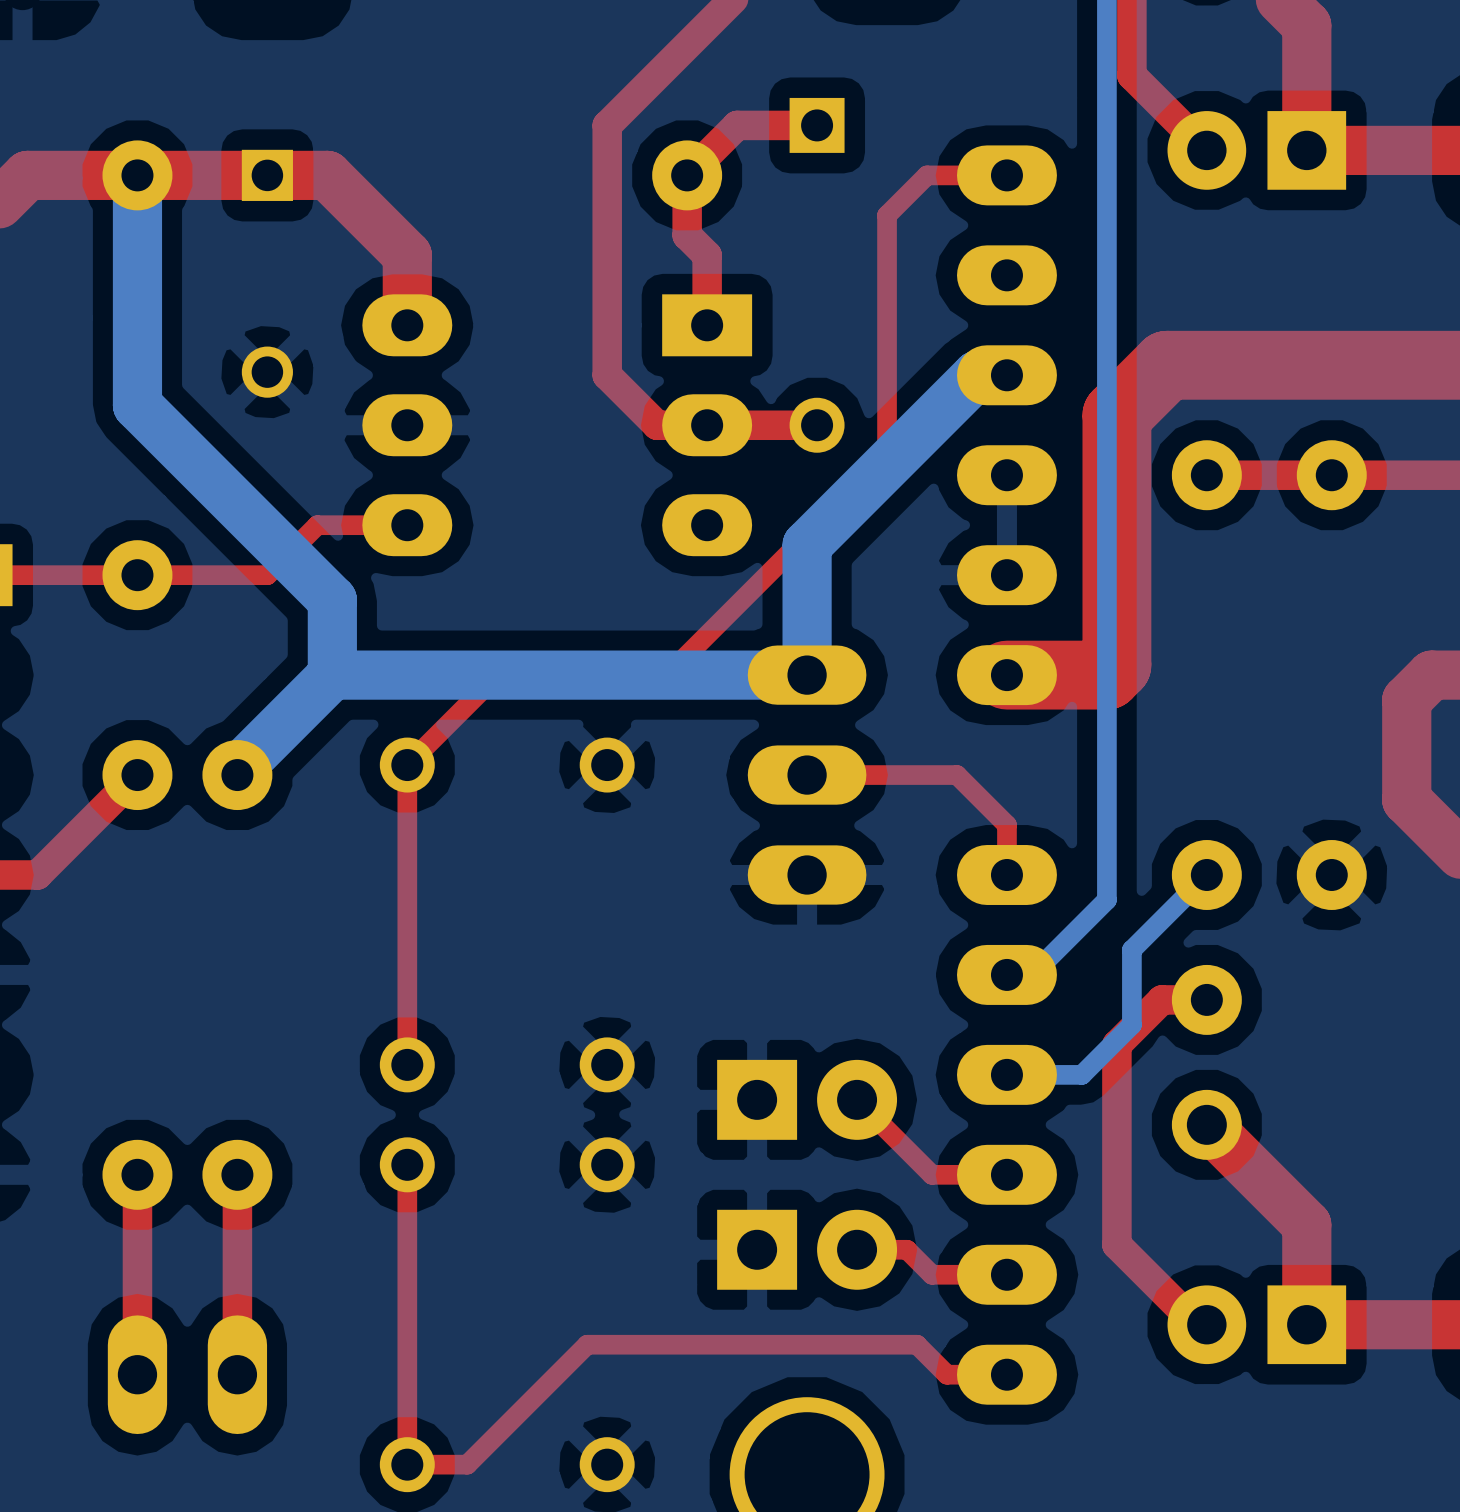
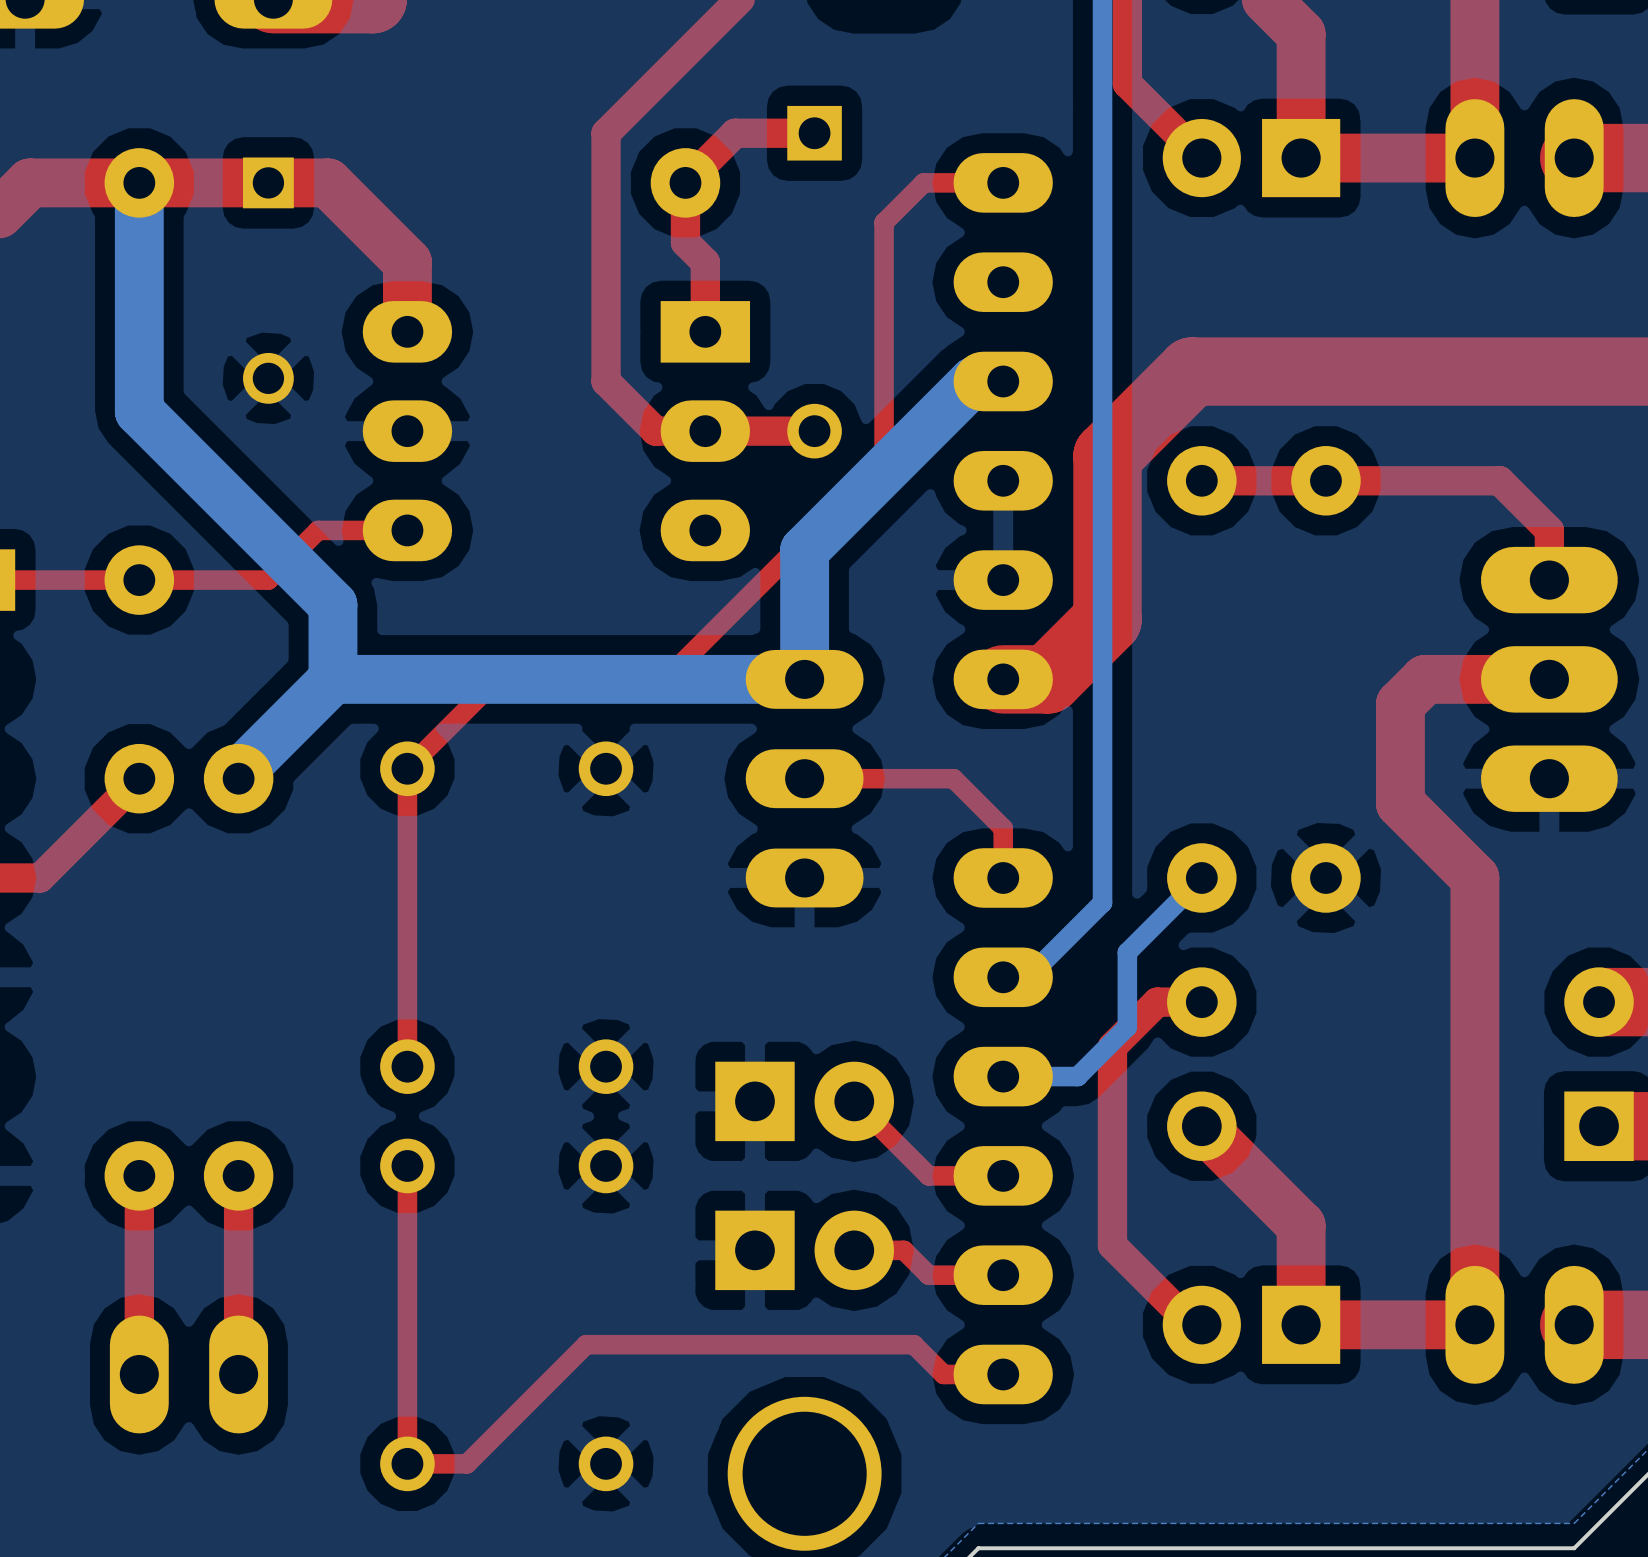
top track: (1196, 365) (1166, 365) (1116, 415) (1116, 665) (1106, 675) (1051, 675) -> (1191, 371) (1107, 455) (1107, 619) (1047, 679)

